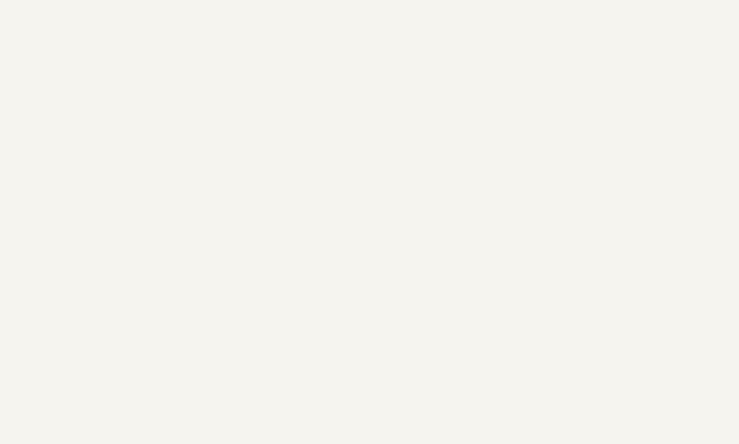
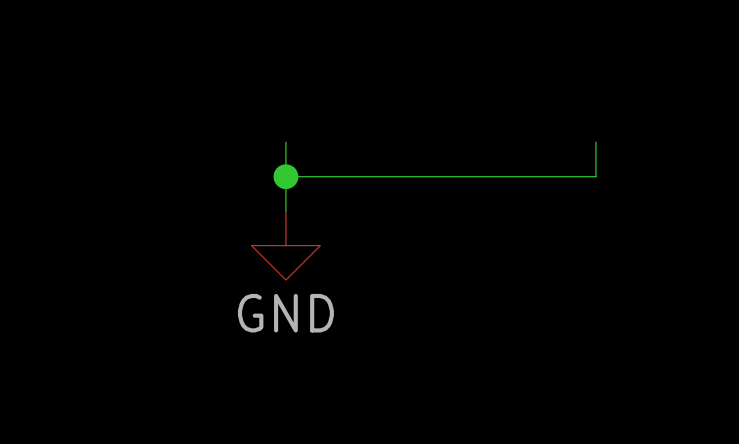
wire: none -> (285, 142) (285, 211)
wire: none -> (595, 142) (595, 176) (285, 176)
junction: none -> (285, 176)
power symbol: none -> GND (285, 245)

